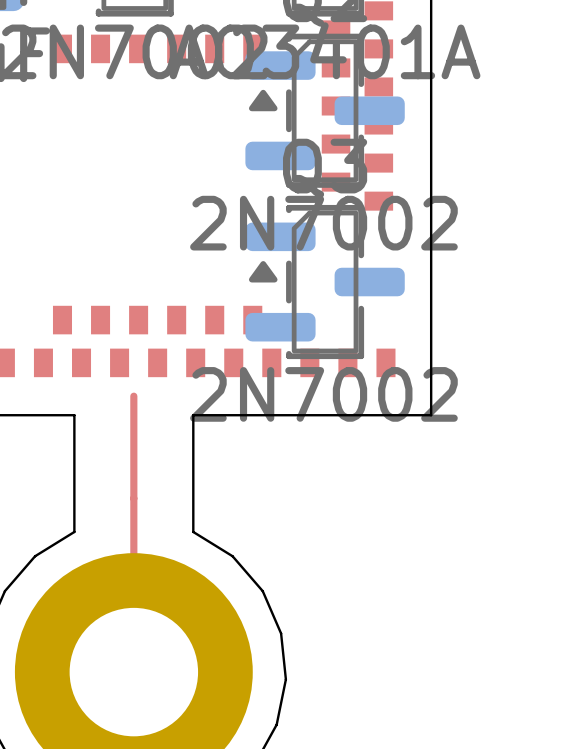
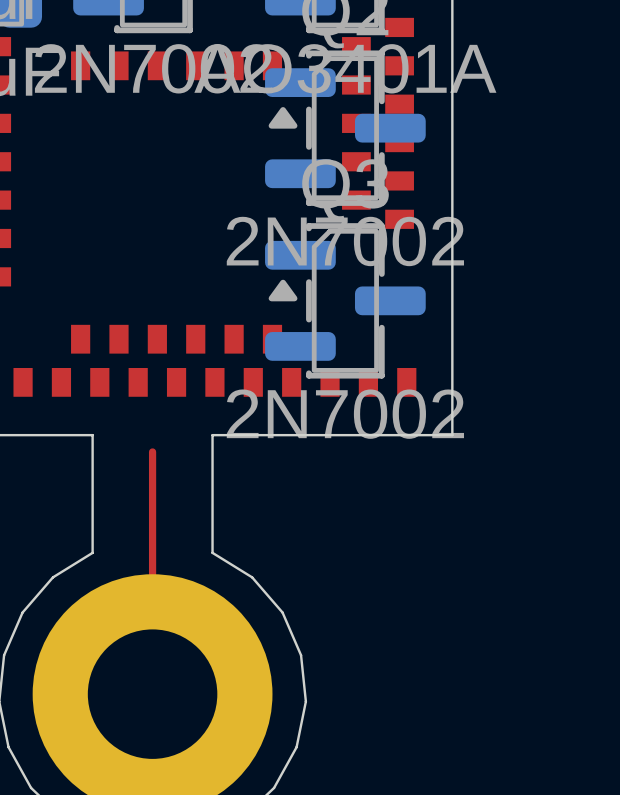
top track: (133, 396) (133, 431) -> none

